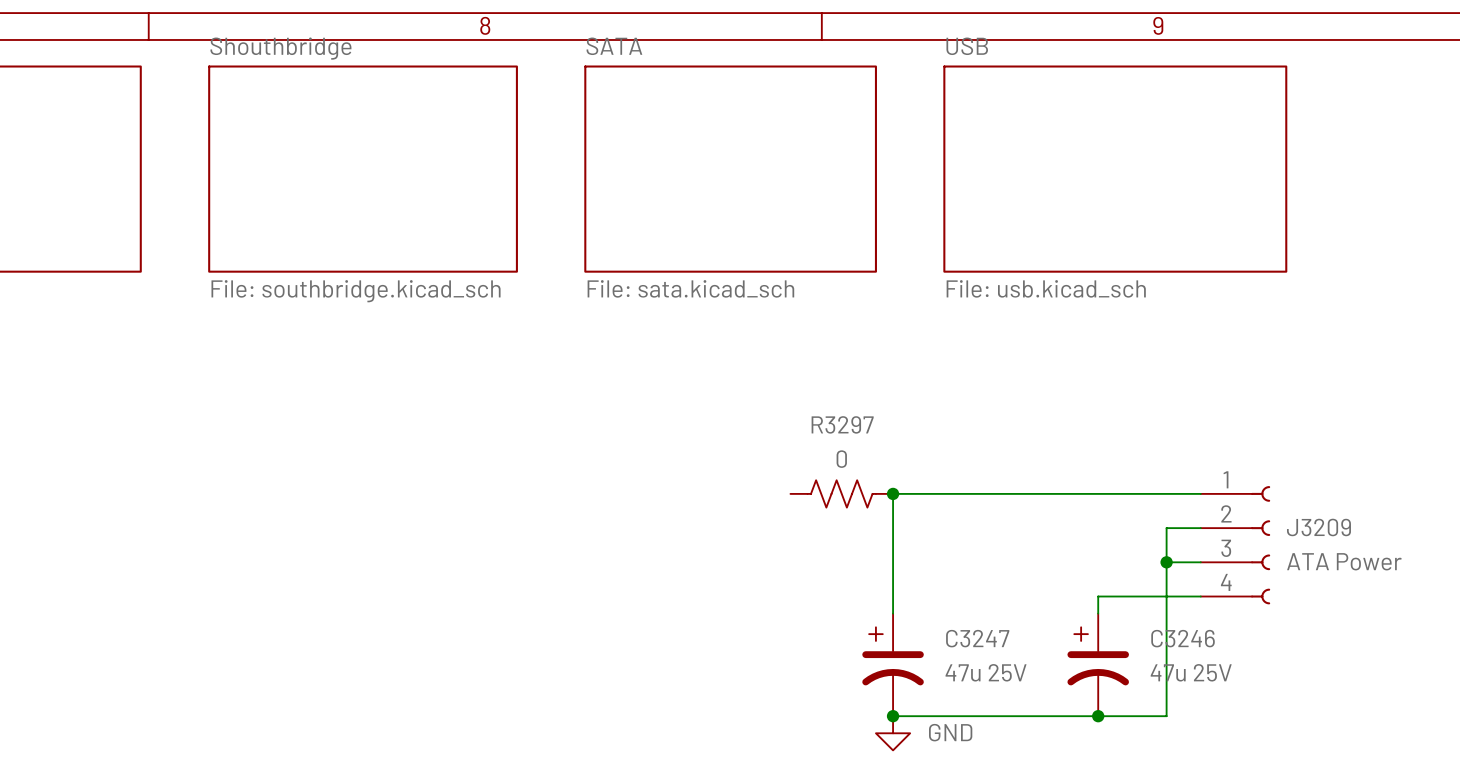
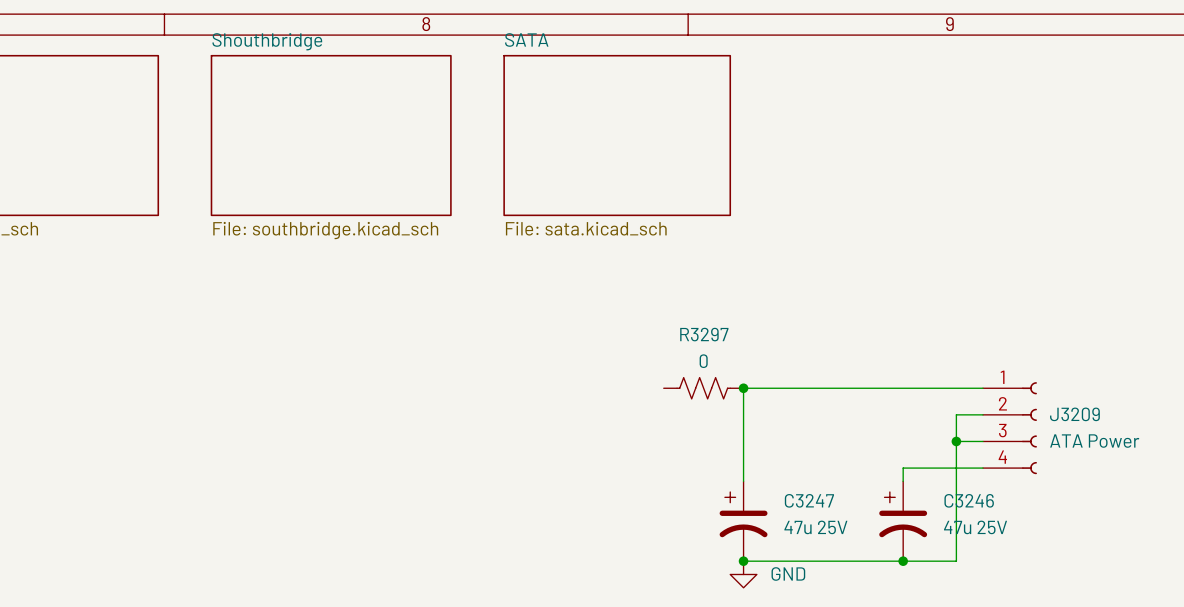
sheet USB: File: usb.kicad_sch (1115, 169) -> none

